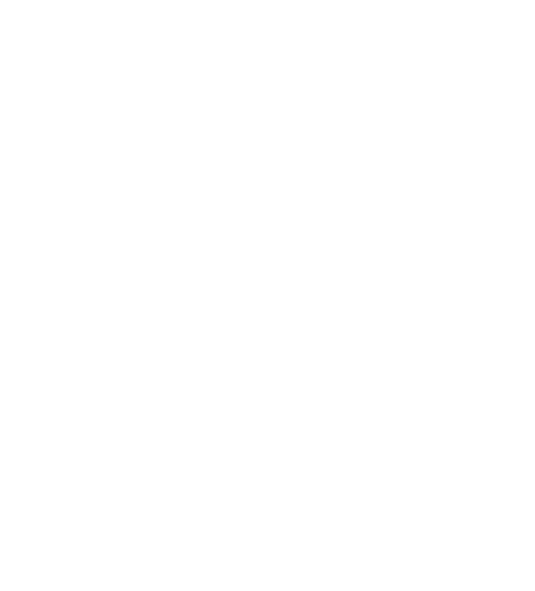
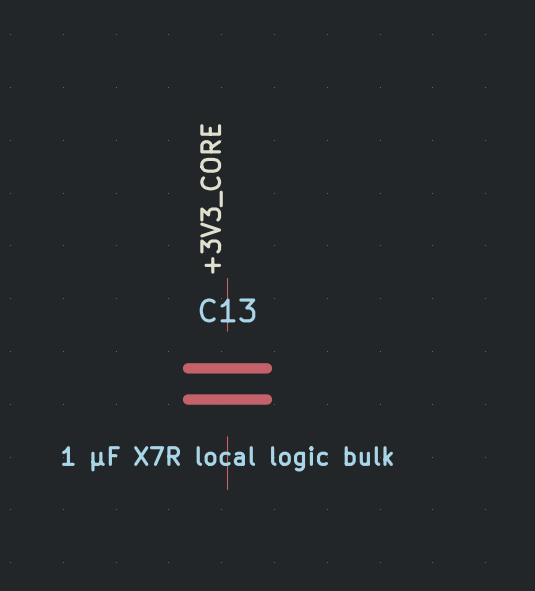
label: none -> +3V3_CORE (211, 198)
C13: none -> 1 µF X7R local logic bulk (227, 383)

